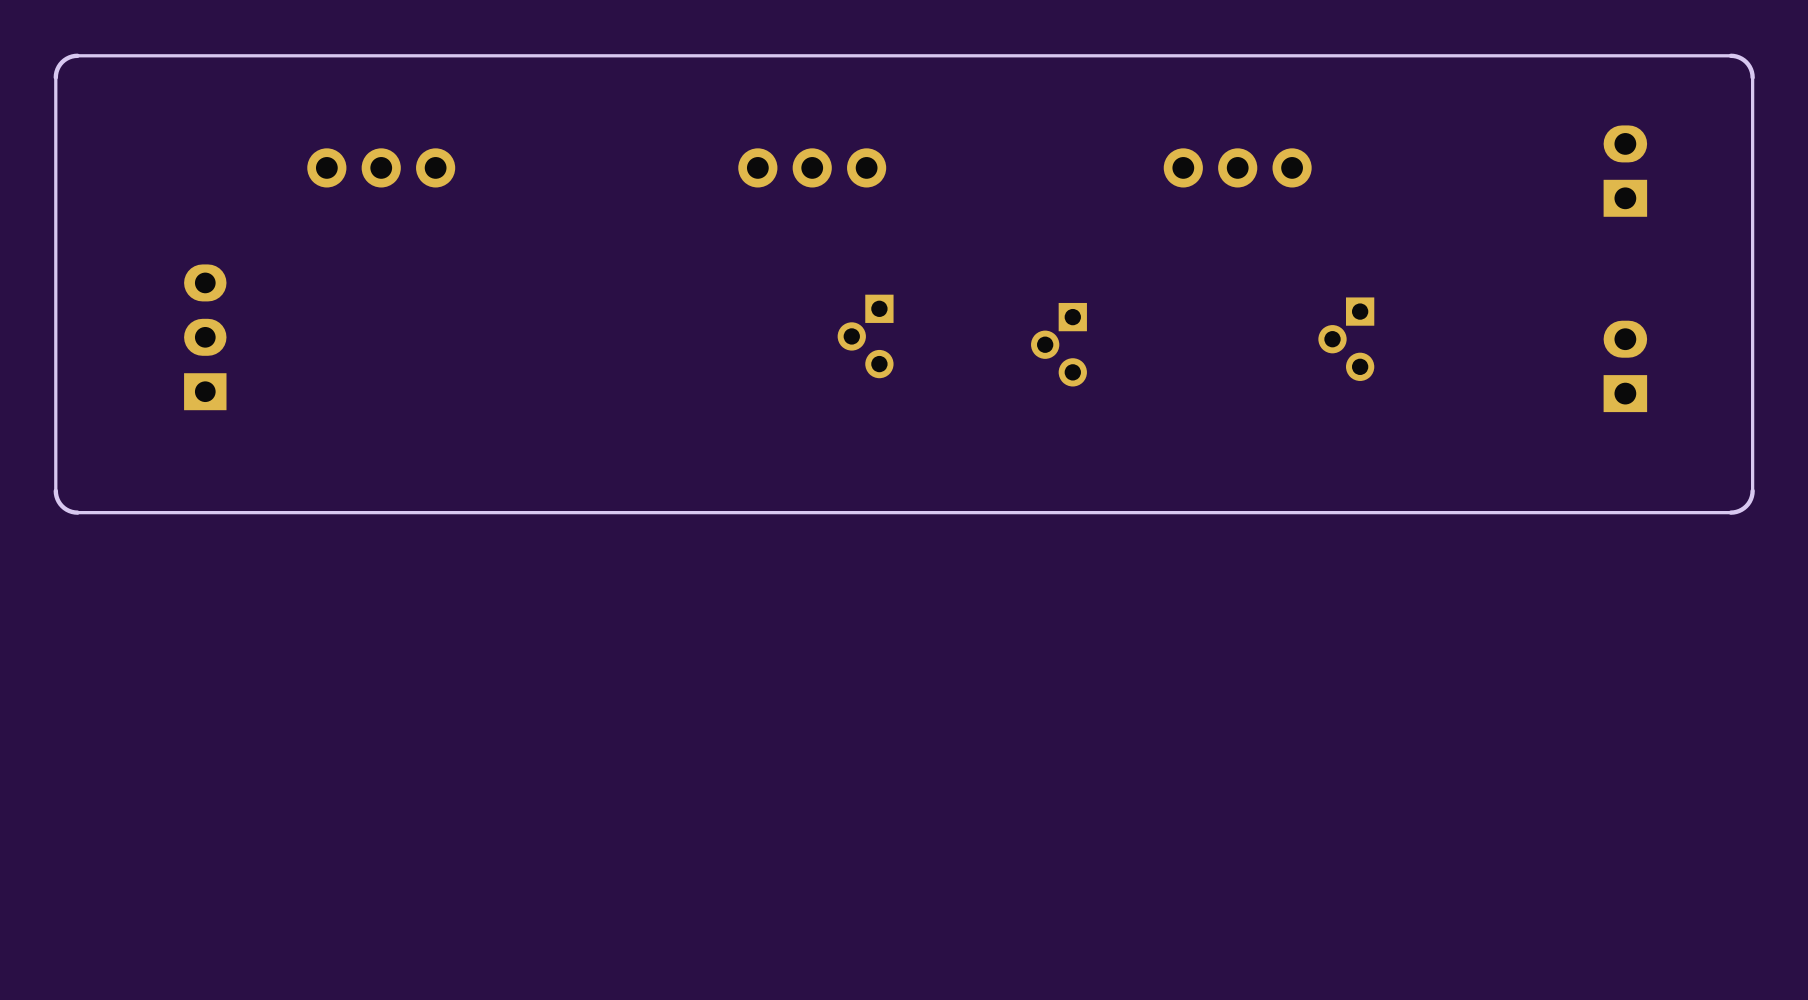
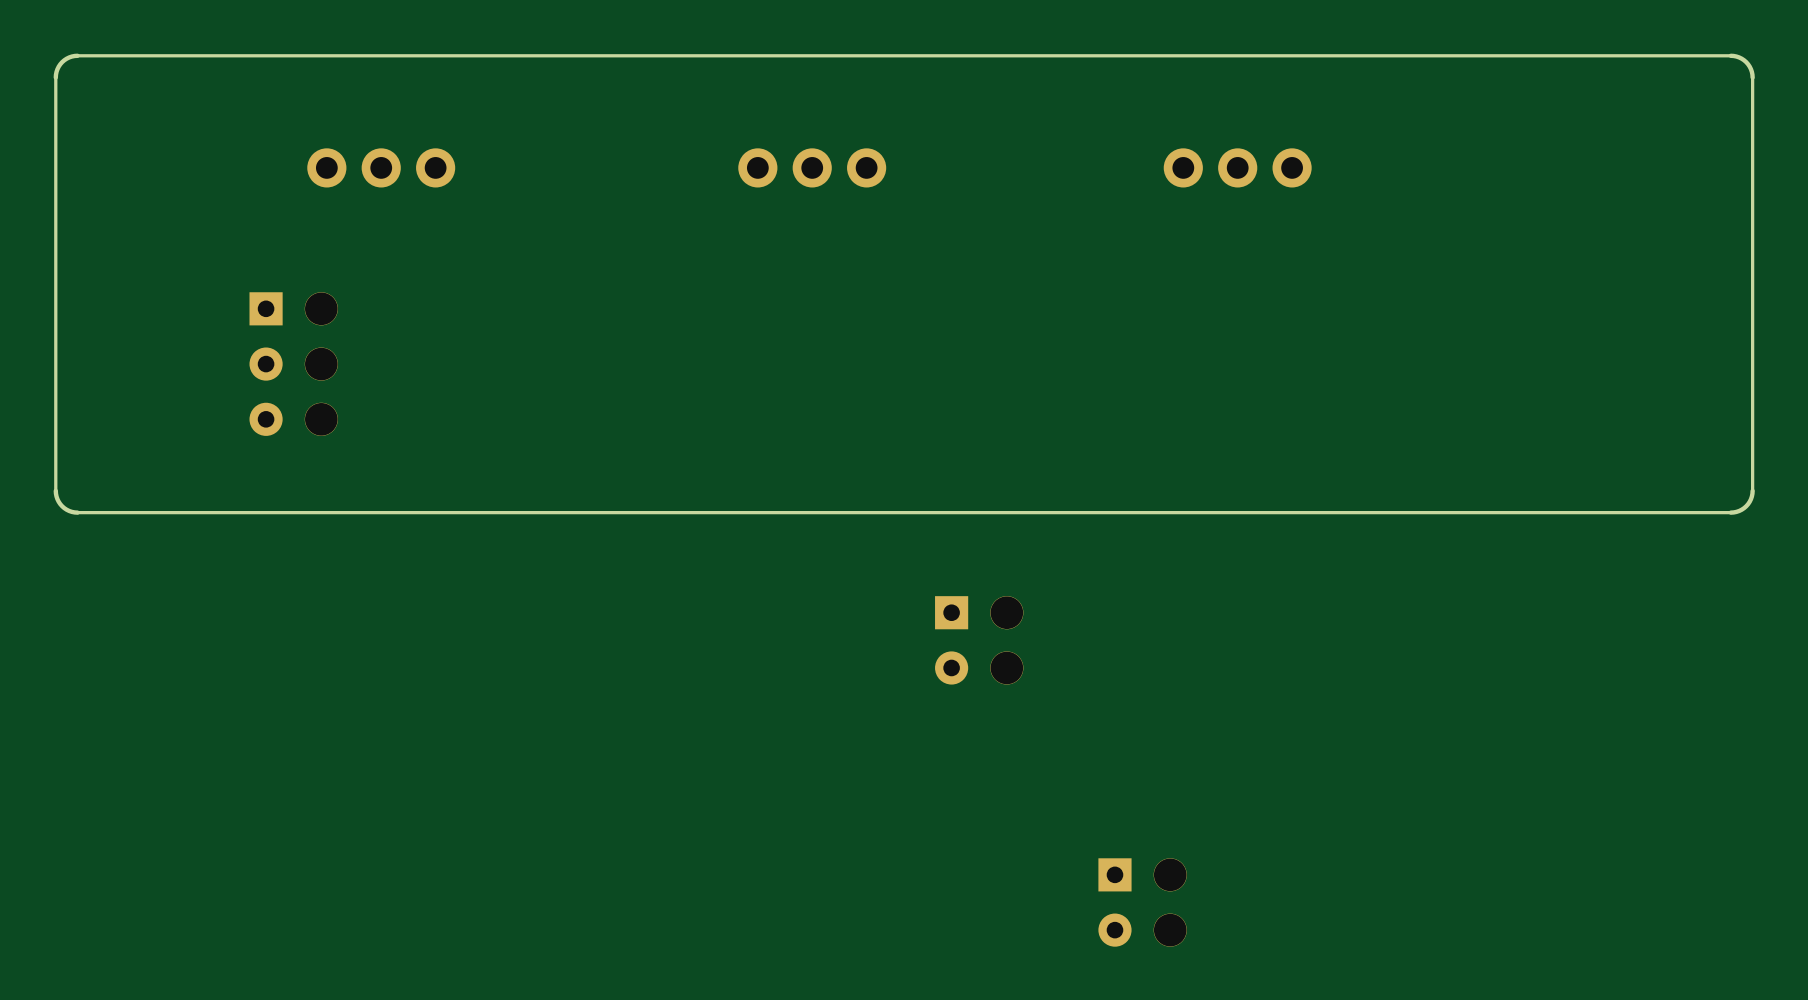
part: (1625, 171) -> none
part: (865, 336) -> none
part: (205, 337) -> none
part: (1346, 339) -> none
part: (1058, 344) -> none
part: none -> (293, 364)
part: (1625, 366) -> none
part: none -> (979, 640)
part: none -> (1142, 902)

